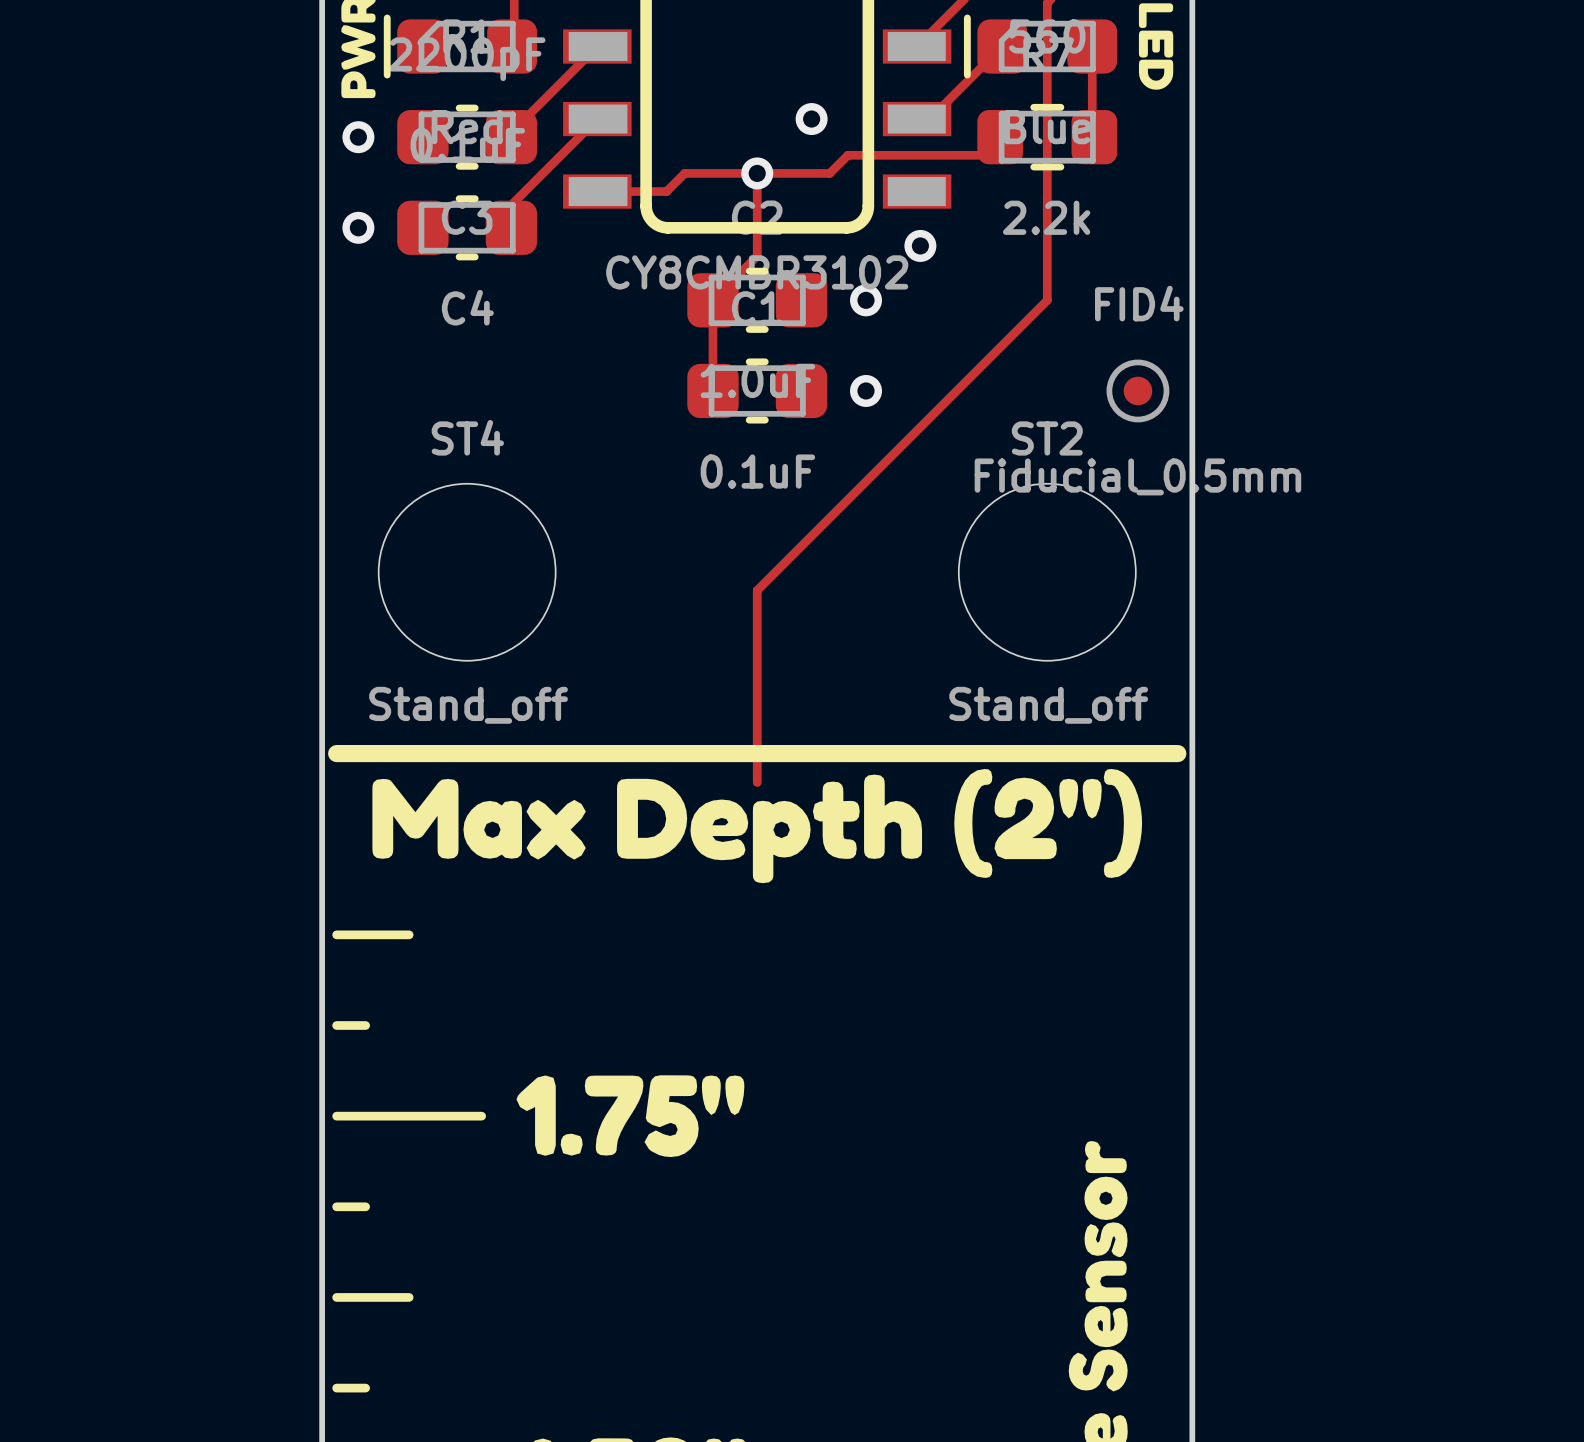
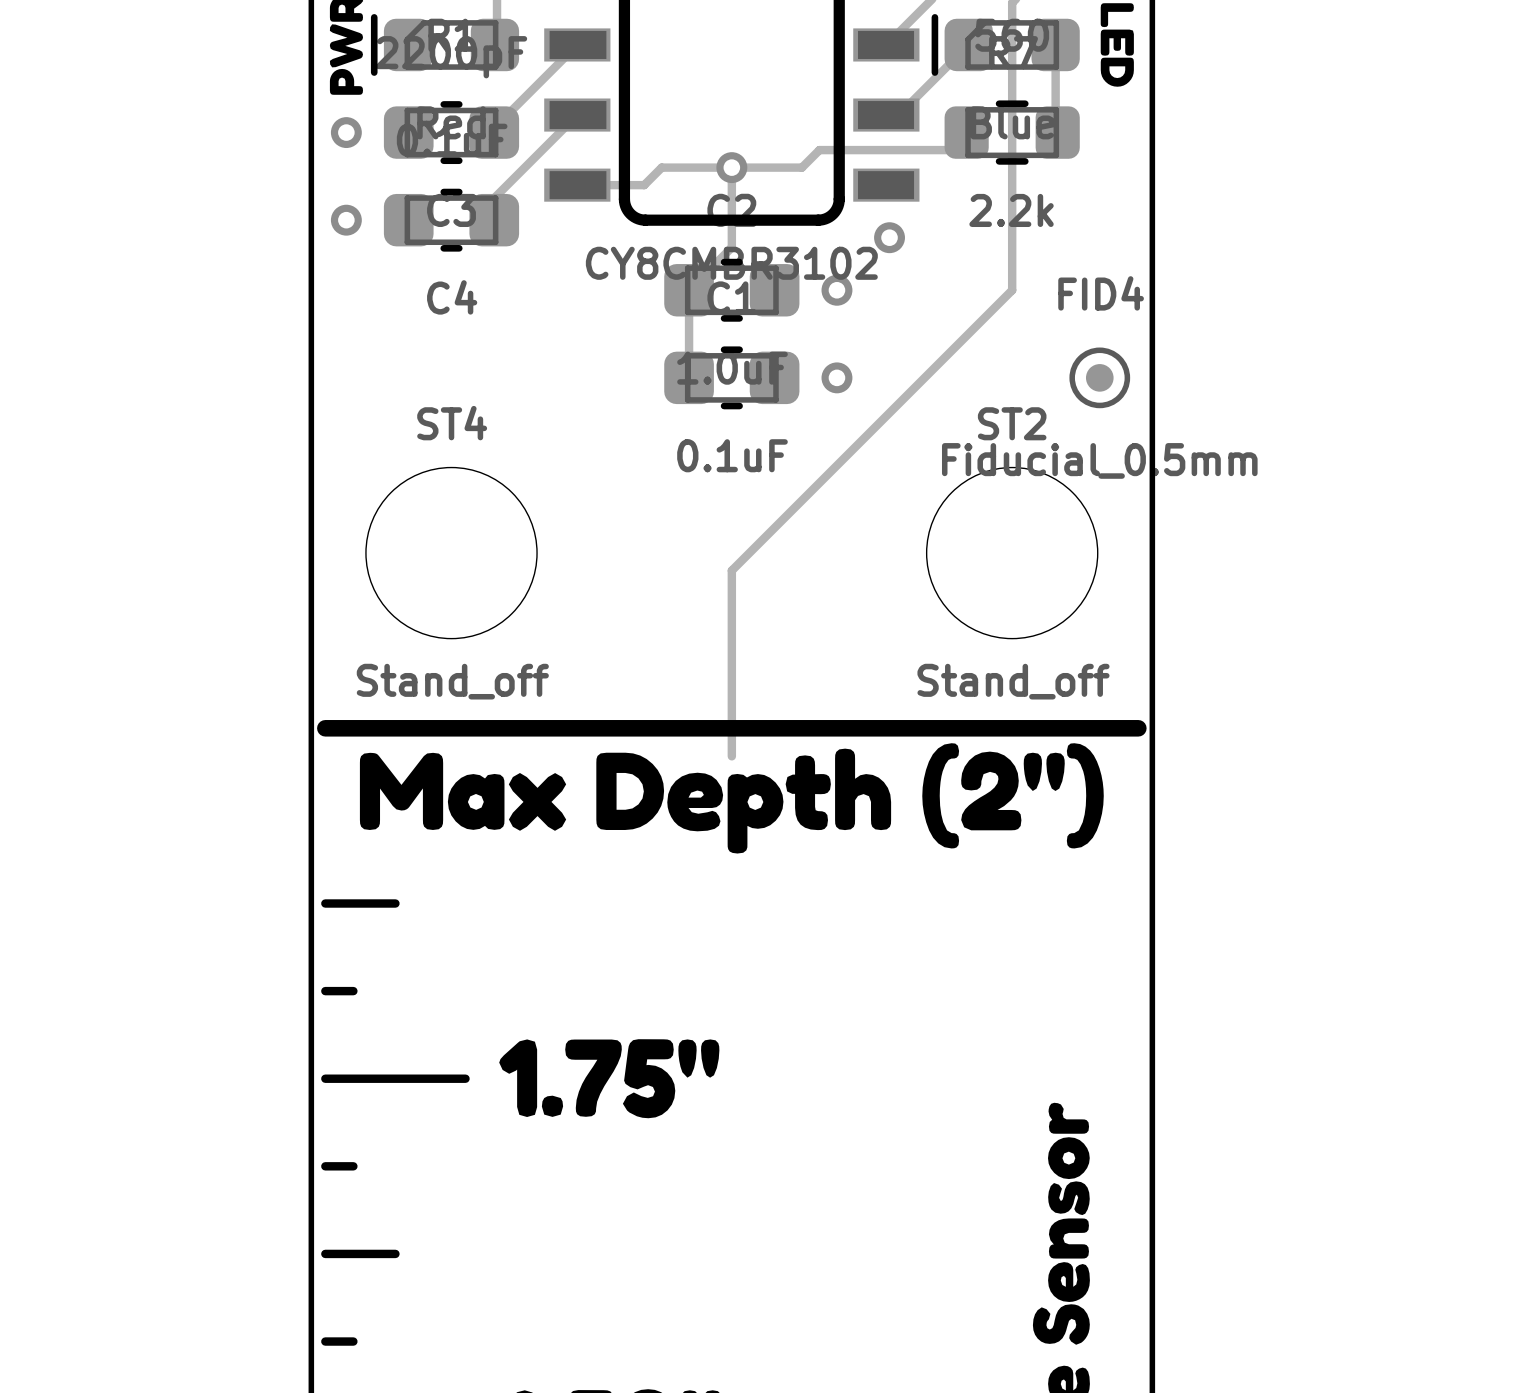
via: (811, 119) -> none

